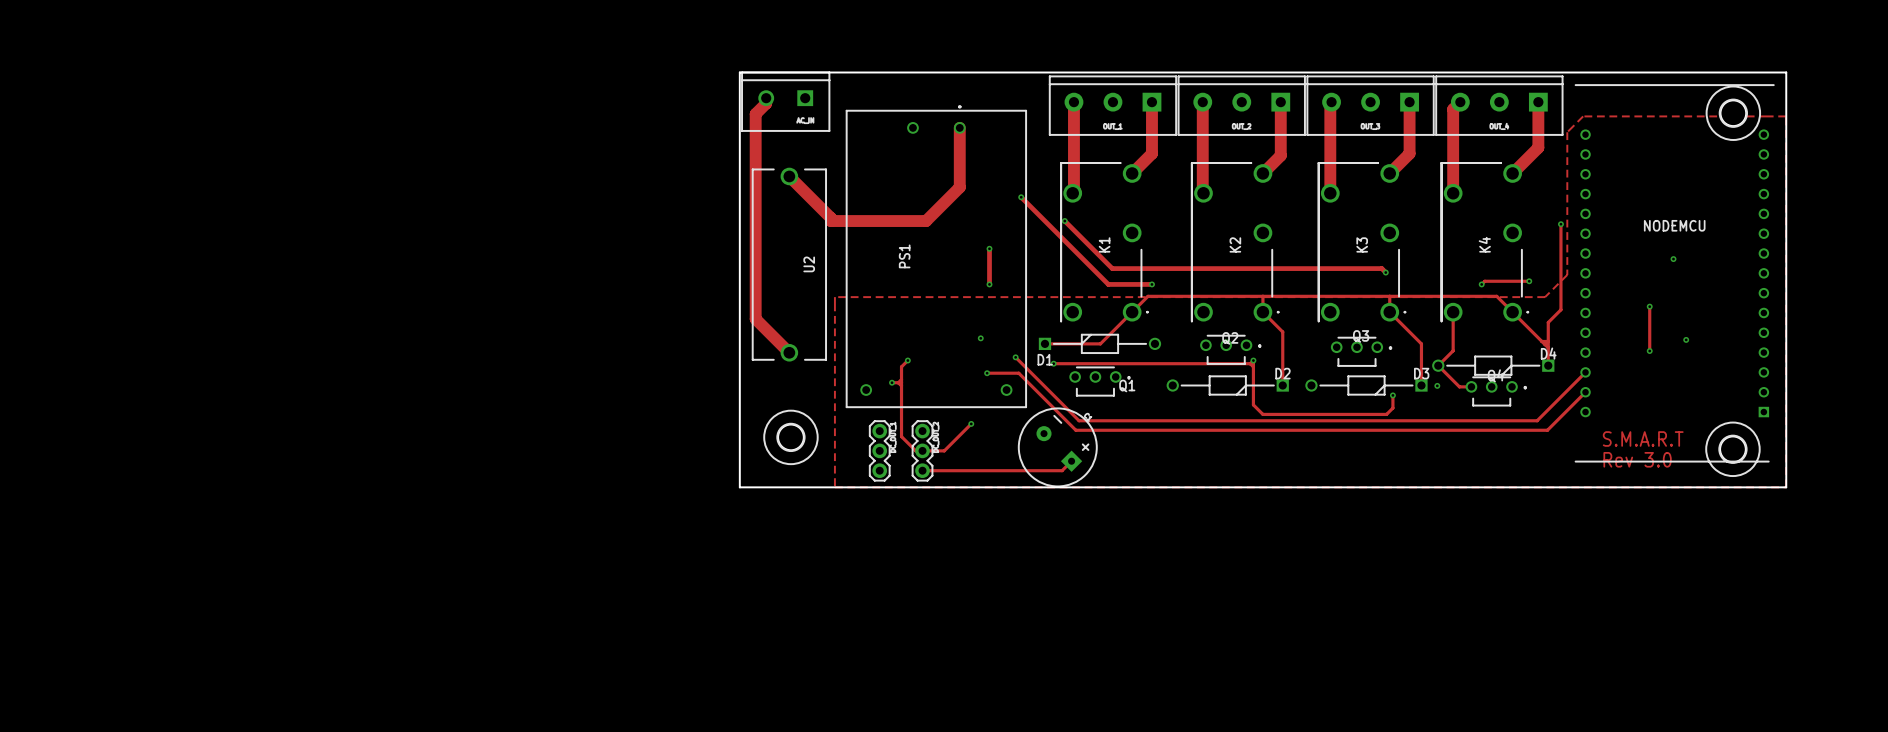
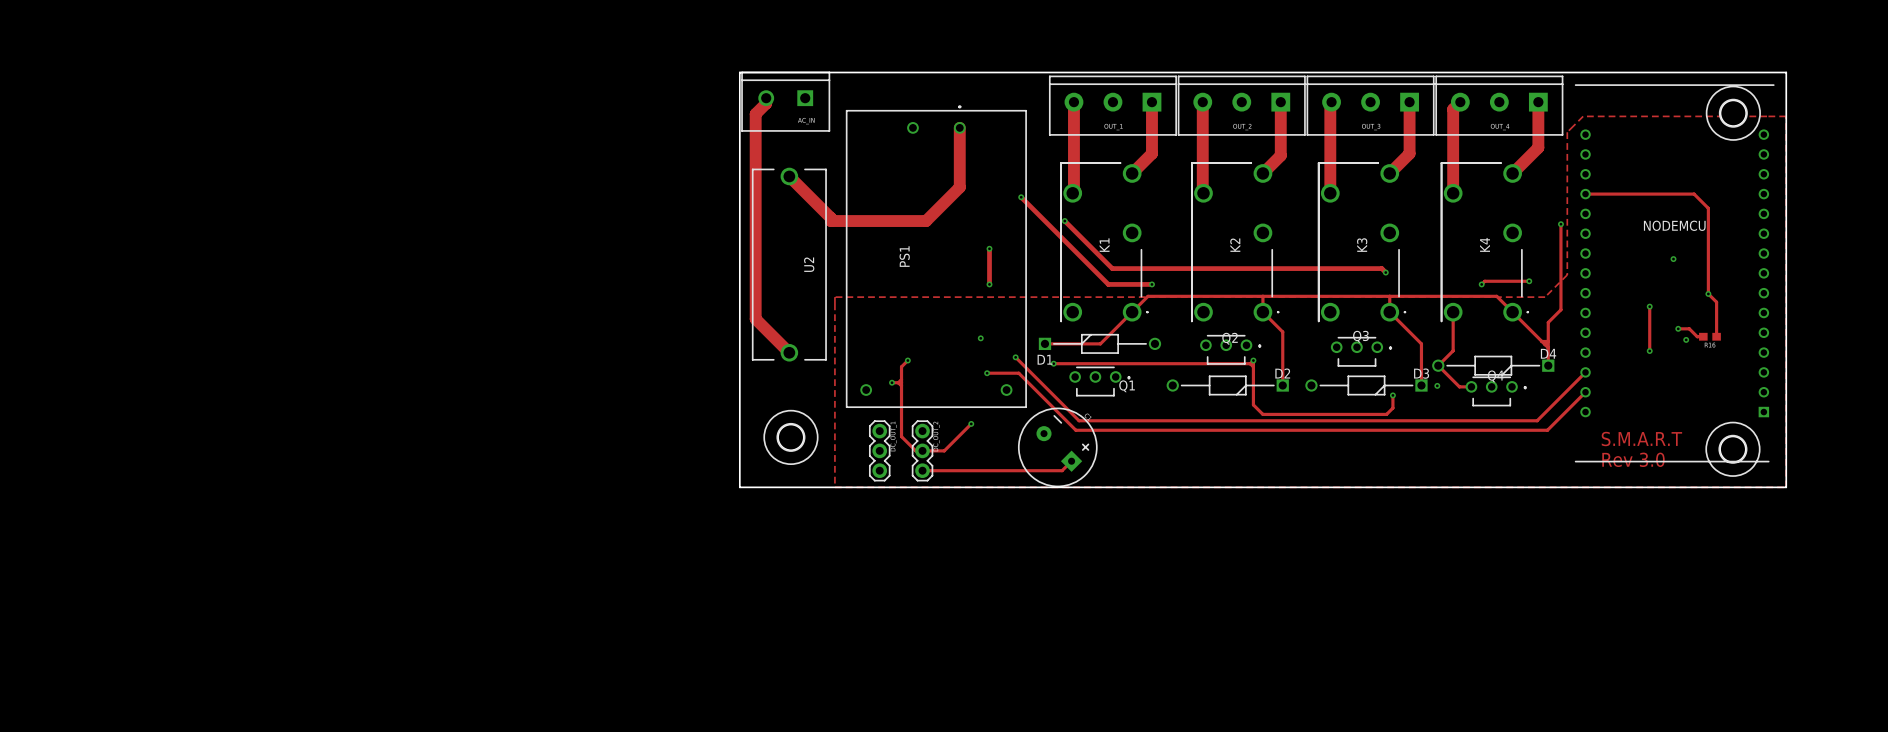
track: none -> (1585, 194) (1694, 194) (1708, 208) (1708, 293) (1716, 302) (1716, 336)
via: none -> (1708, 293)
track: none -> (1678, 328) (1689, 328) (1697, 336) (1703, 336)
via: none -> (1678, 328)
part: none -> (1709, 336)

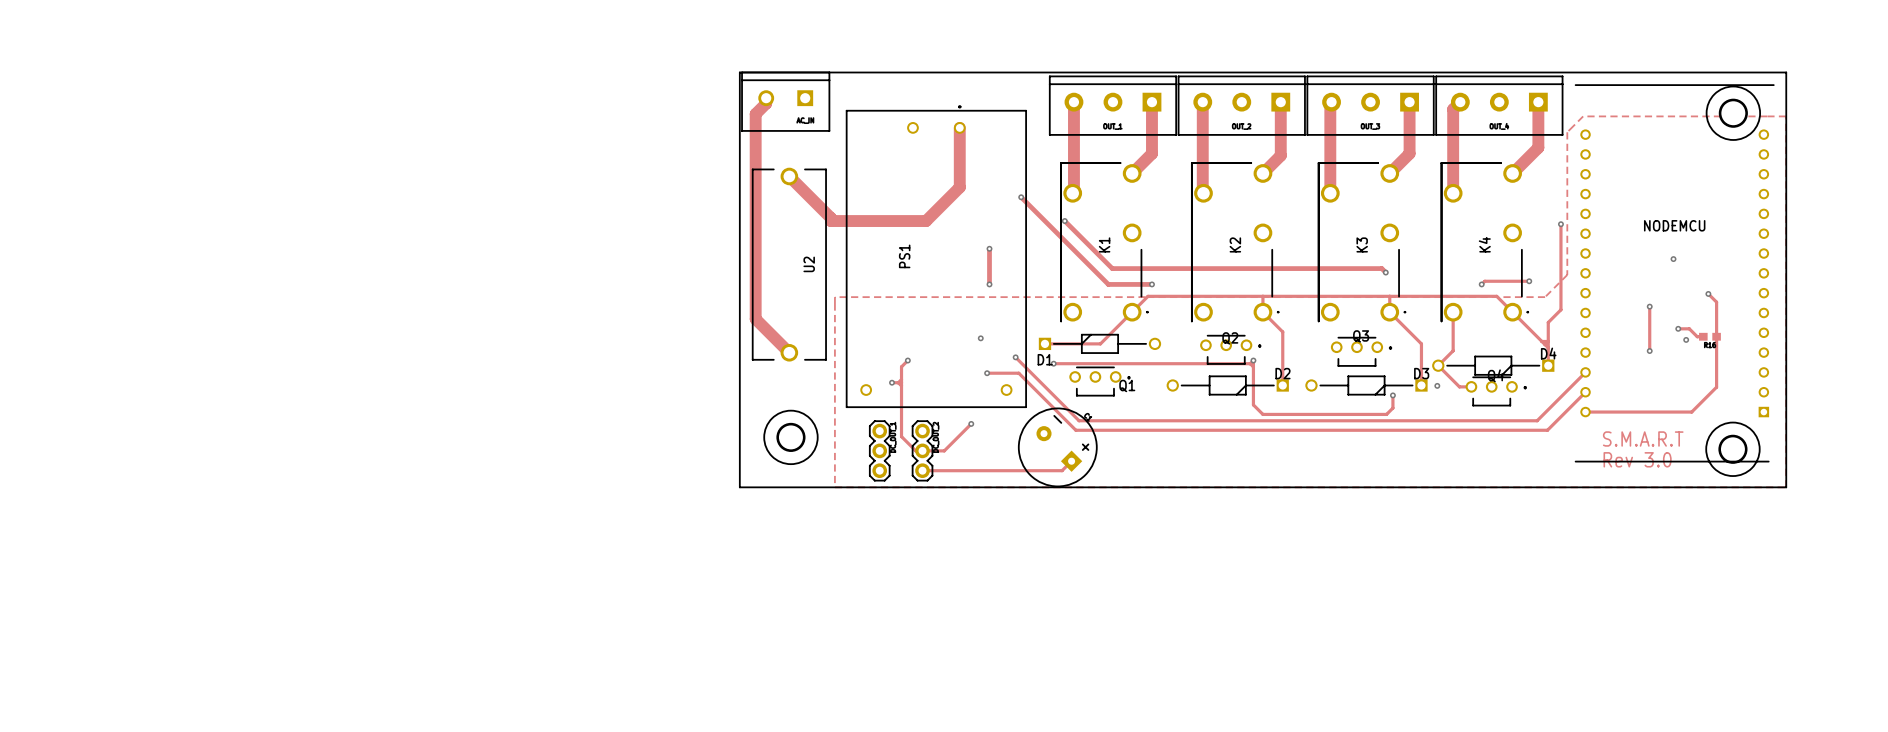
track: (1585, 194) (1694, 194) (1708, 208) (1708, 293) -> none
track: none -> (1716, 336) (1716, 387) (1691, 412) (1585, 412)

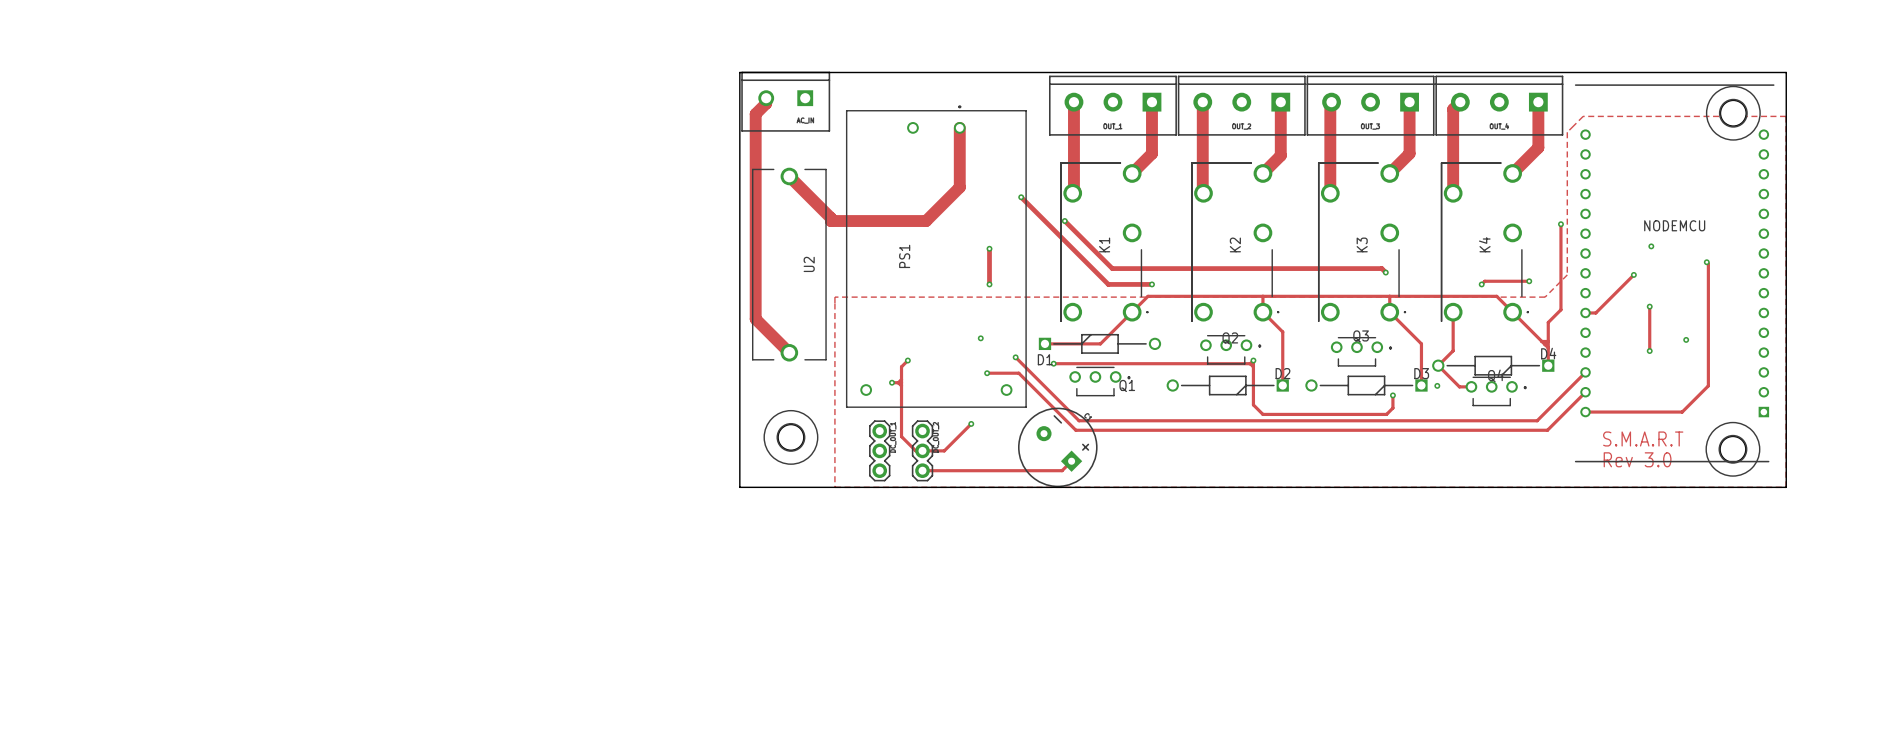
via: none -> (1651, 246)
via: (1673, 259) -> none
via: none -> (1706, 262)
track: none -> (1633, 274) (1595, 312) (1585, 312)
via: none -> (1633, 274)
track: (1708, 293) (1716, 302) (1716, 387) (1691, 412) (1682, 412) -> (1706, 262) (1708, 263) (1708, 385) (1682, 412)
via: (1708, 293) -> none
track: (1678, 328) (1689, 328) (1697, 336) (1703, 336) -> none
via: (1678, 328) -> none
part: (1709, 336) -> none

